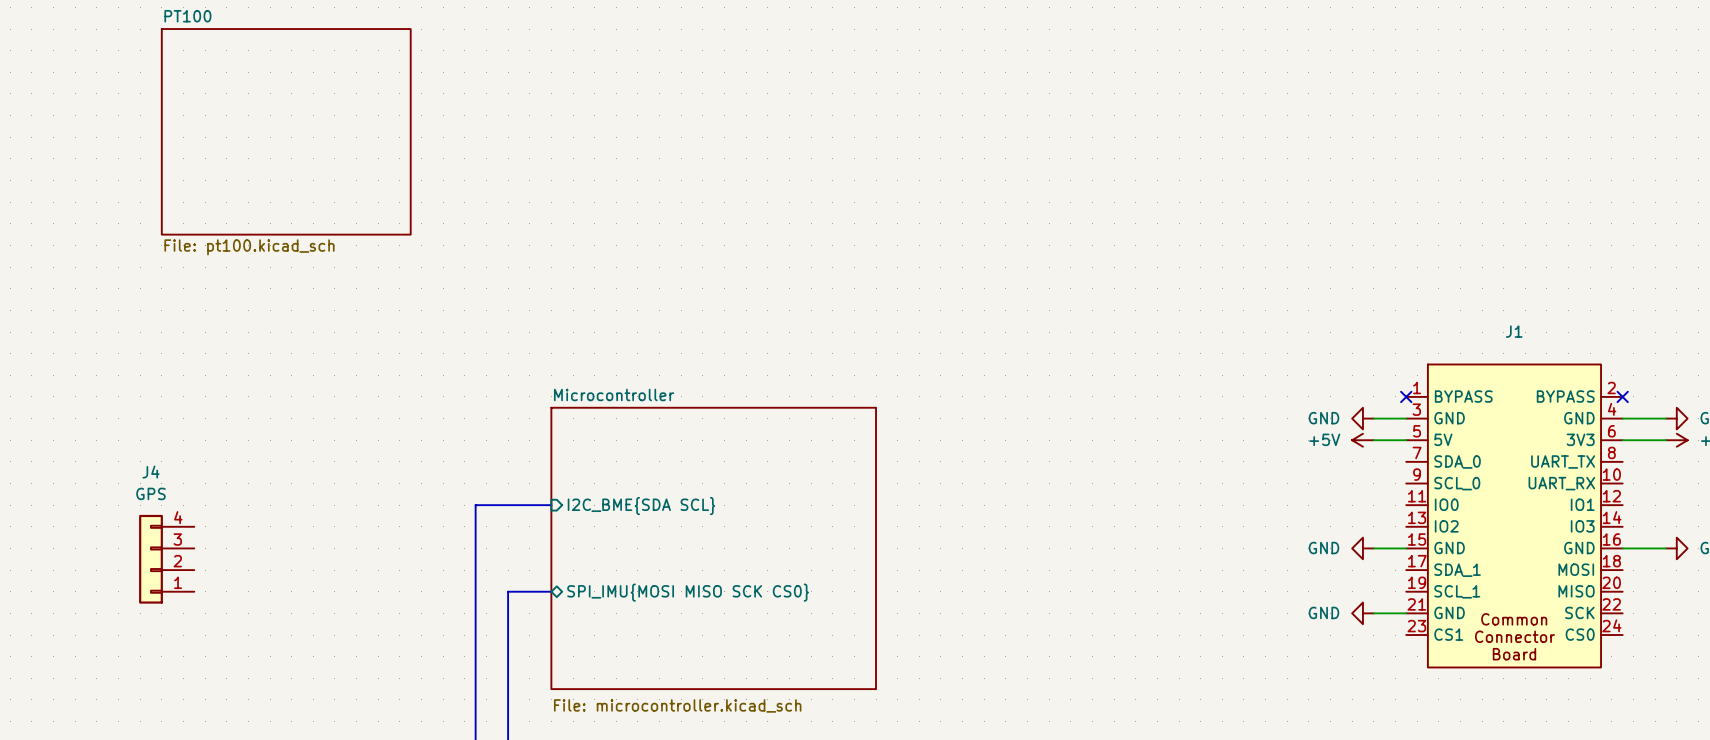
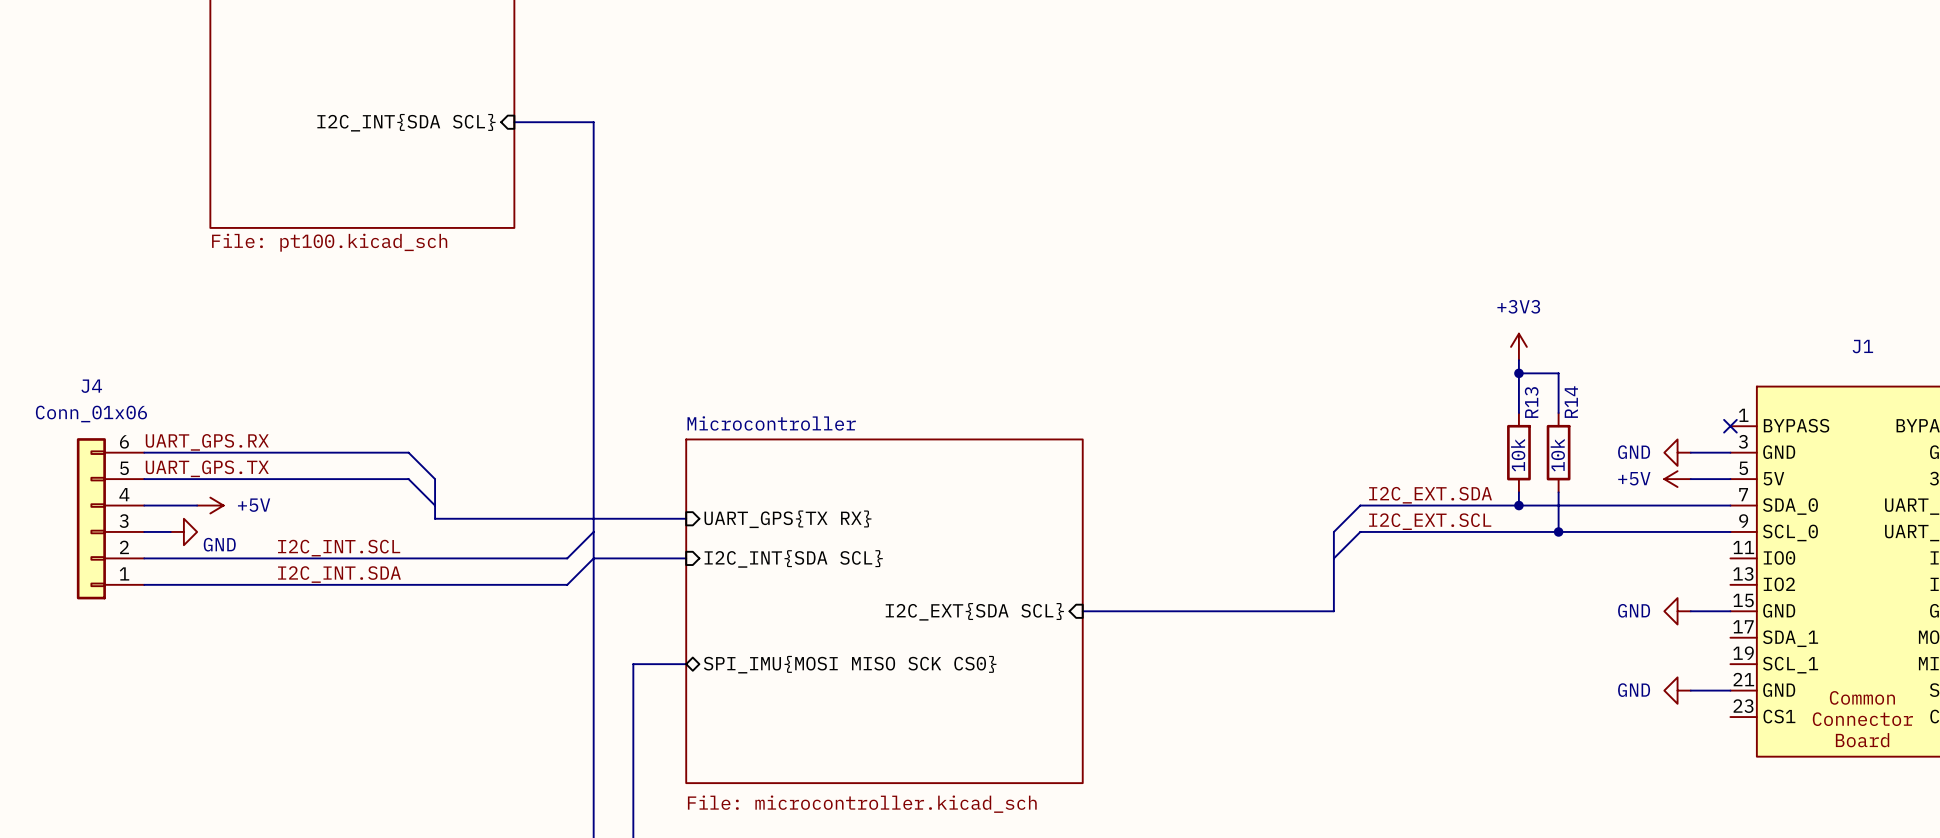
sheet pin: none -> I2C_INT{SDA SCL} (406, 122)
bus: none -> (514, 122) (593, 122) (593, 558)
power symbol: none -> +3V3 (1518, 346)
wire: none -> (1518, 360) (1518, 413)
wire: none -> (1518, 373) (1558, 373) (1558, 413)
junction: none -> (1518, 373)
label: none -> UART_GPS.RX (207, 442)
wire: none -> (144, 452) (408, 452) (435, 479)
R13: none -> 10k (1518, 452)
R14: none -> 10k (1558, 452)
label: none -> UART_GPS.TX (207, 468)
wire: none -> (144, 479) (408, 479) (435, 505)
bus: none -> (435, 479) (435, 518) (686, 518)
wire: none -> (1518, 492) (1518, 505)
wire: none -> (1558, 492) (1558, 531)
label: none -> I2C_EXT.SDA (1430, 495)
wire: none -> (144, 505) (197, 505)
power symbol: none -> +5V (210, 505)
junction: none -> (1518, 505)
wire: none -> (1730, 505) (1360, 505) (1333, 531)
J4 name position: J4 (150, 472) -> J4 (91, 386)
sheet pin: none -> UART_GPS{TX RX} (787, 519)
label: none -> I2C_EXT.SCL (1430, 521)
wire: none -> (144, 531) (170, 531)
power symbol: none -> GND (183, 531)
wire: none -> (593, 531) (567, 558) (144, 558)
bus: none -> (1333, 531) (1333, 611) (1082, 611)
junction: none -> (1558, 531)
wire: none -> (1730, 531) (1360, 531) (1333, 558)
J4 value: GPS (150, 493) -> Conn_01x06 (91, 414)
label: none -> I2C_INT.SCL (339, 548)
wire: none -> (593, 558) (567, 584) (144, 584)
sheet pin: I2C_BME{SDA SCL} (641, 506) -> I2C_INT{SDA SCL} (793, 558)
J4 symbol: [139, 514, 195, 604] -> [76, 438, 145, 600]
label: none -> I2C_INT.SDA (339, 574)
sheet pin: none -> I2C_EXT{SDA SCL} (974, 611)

